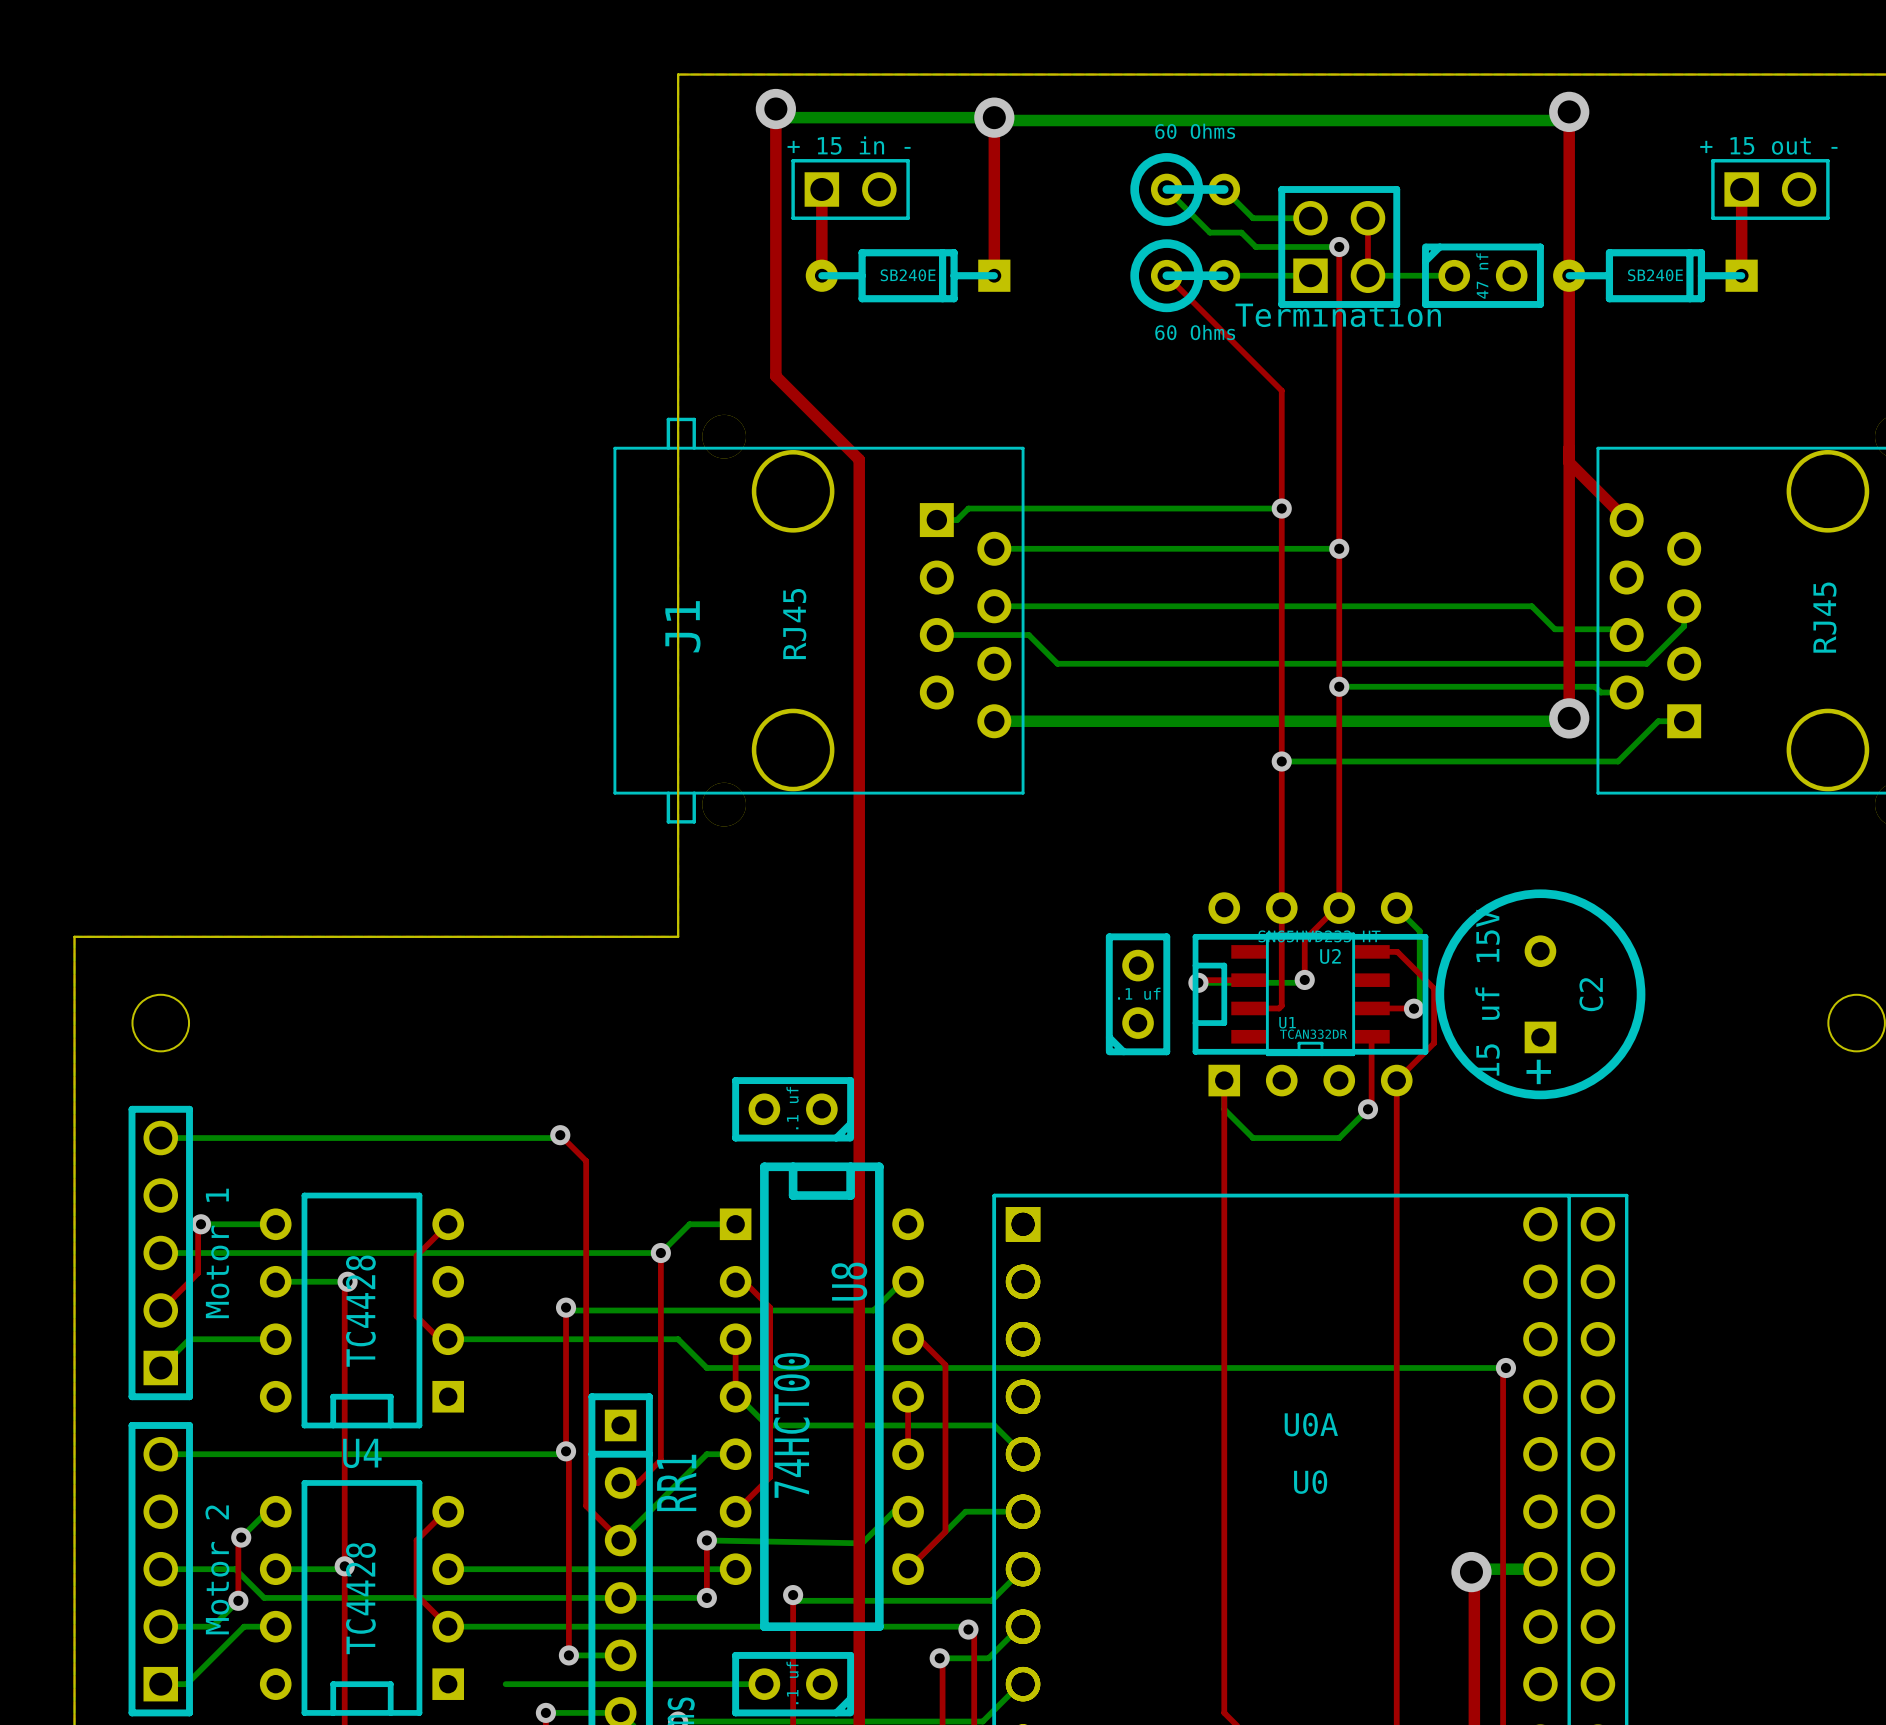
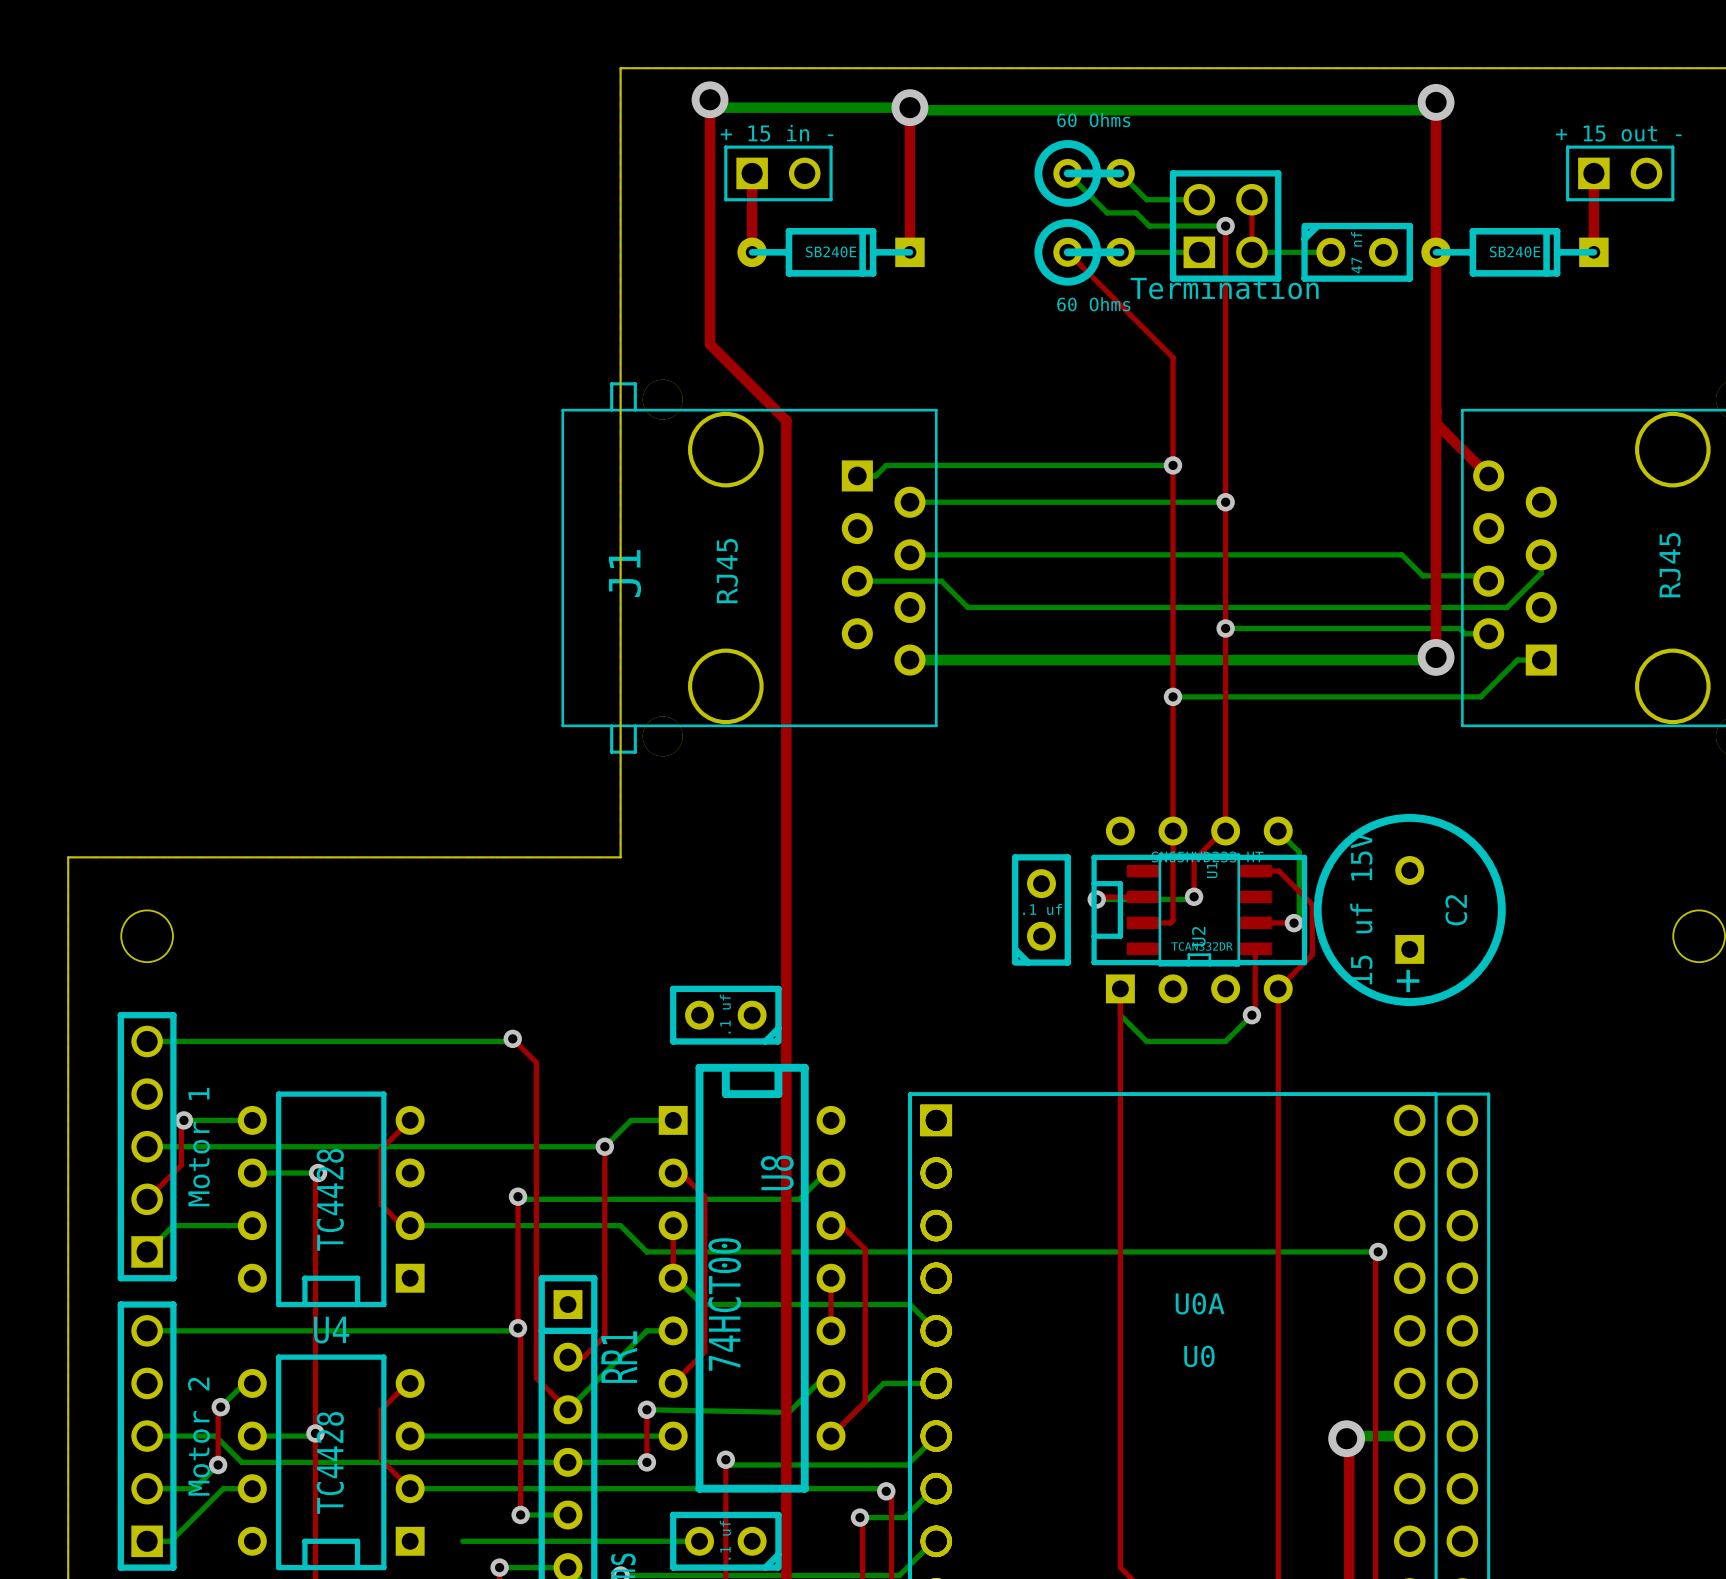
U2 name rotation: 0° (1330, 956) -> 90° counterclockwise (1198, 936)
U2 name position: U2 (1330, 956) -> U2 (1198, 936)
U1 name rotation: 0° (1287, 1022) -> 90° counterclockwise (1212, 870)
U1 name position: U1 (1287, 1022) -> U1 (1212, 870)

